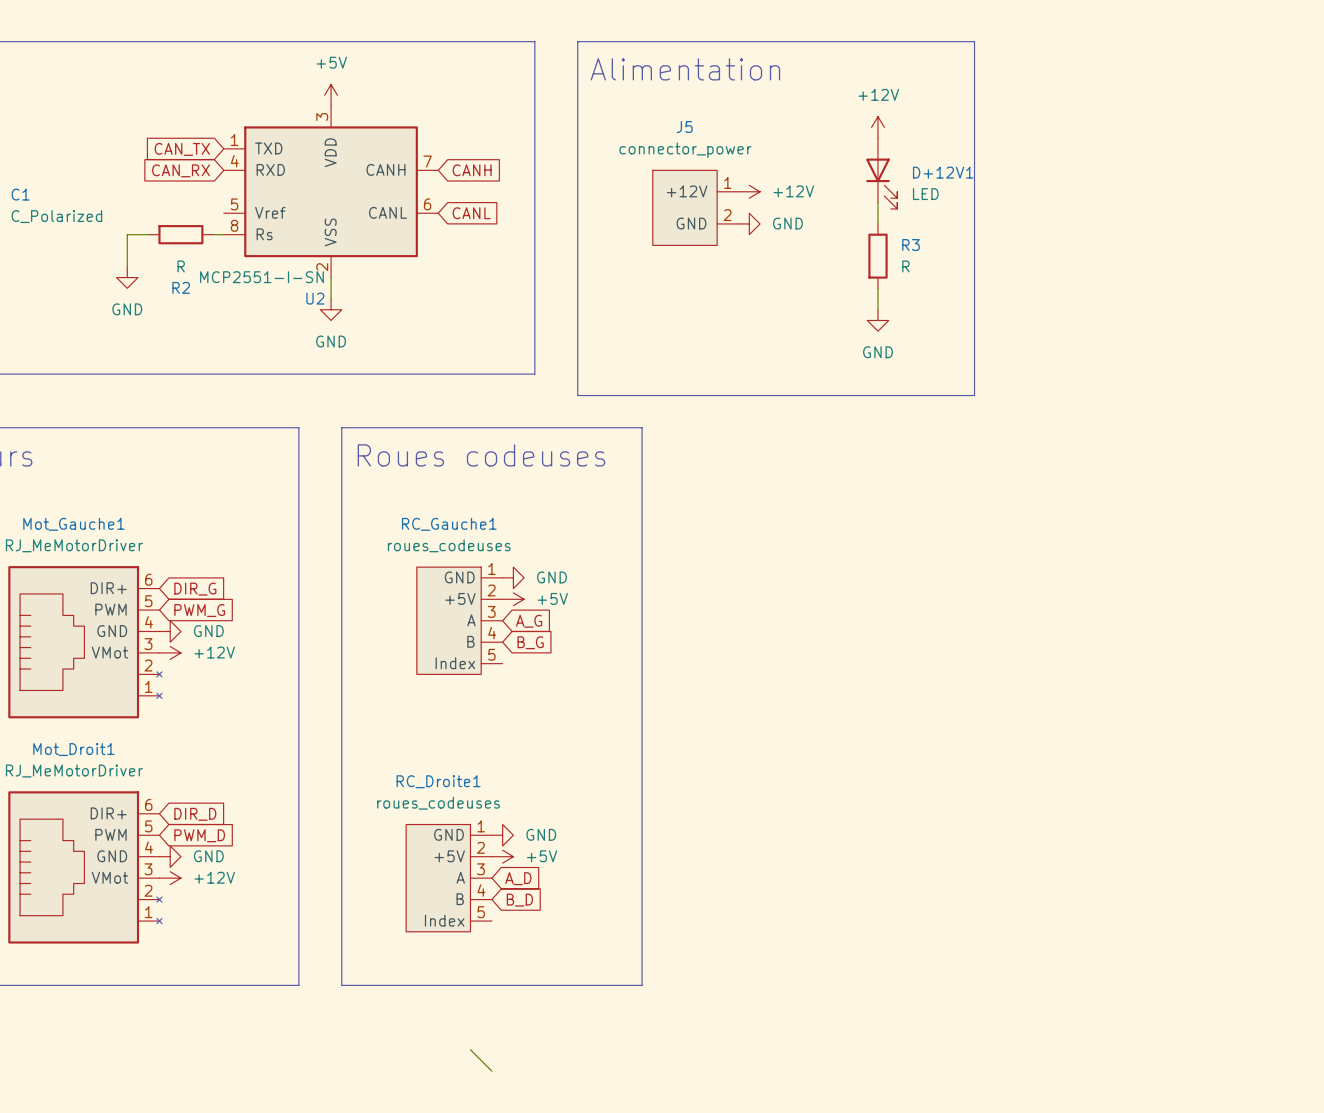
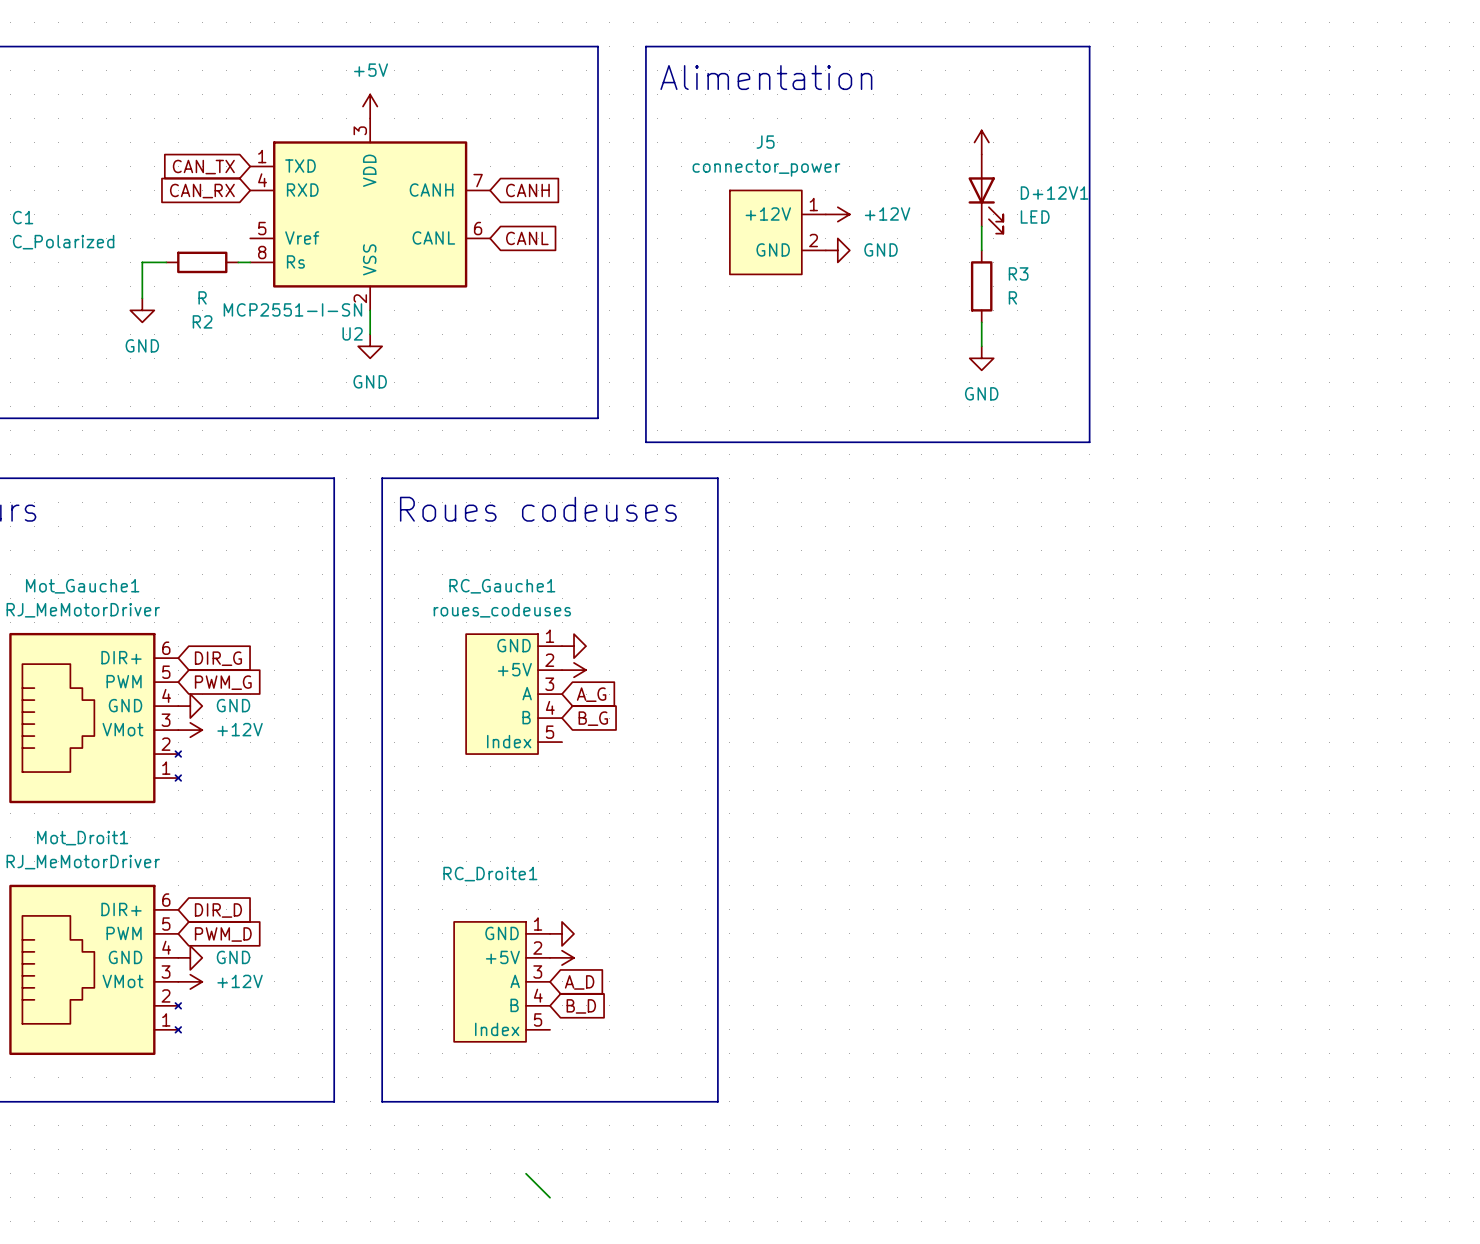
power symbol text: +12V (878, 94) -> none
power symbol text: GND (552, 577) -> none
power symbol text: +5V (552, 598) -> none
RC_Droite1 value: roues_codeuses (438, 803) -> none
power symbol text: GND (541, 834) -> none
power symbol text: +5V (542, 856) -> none

